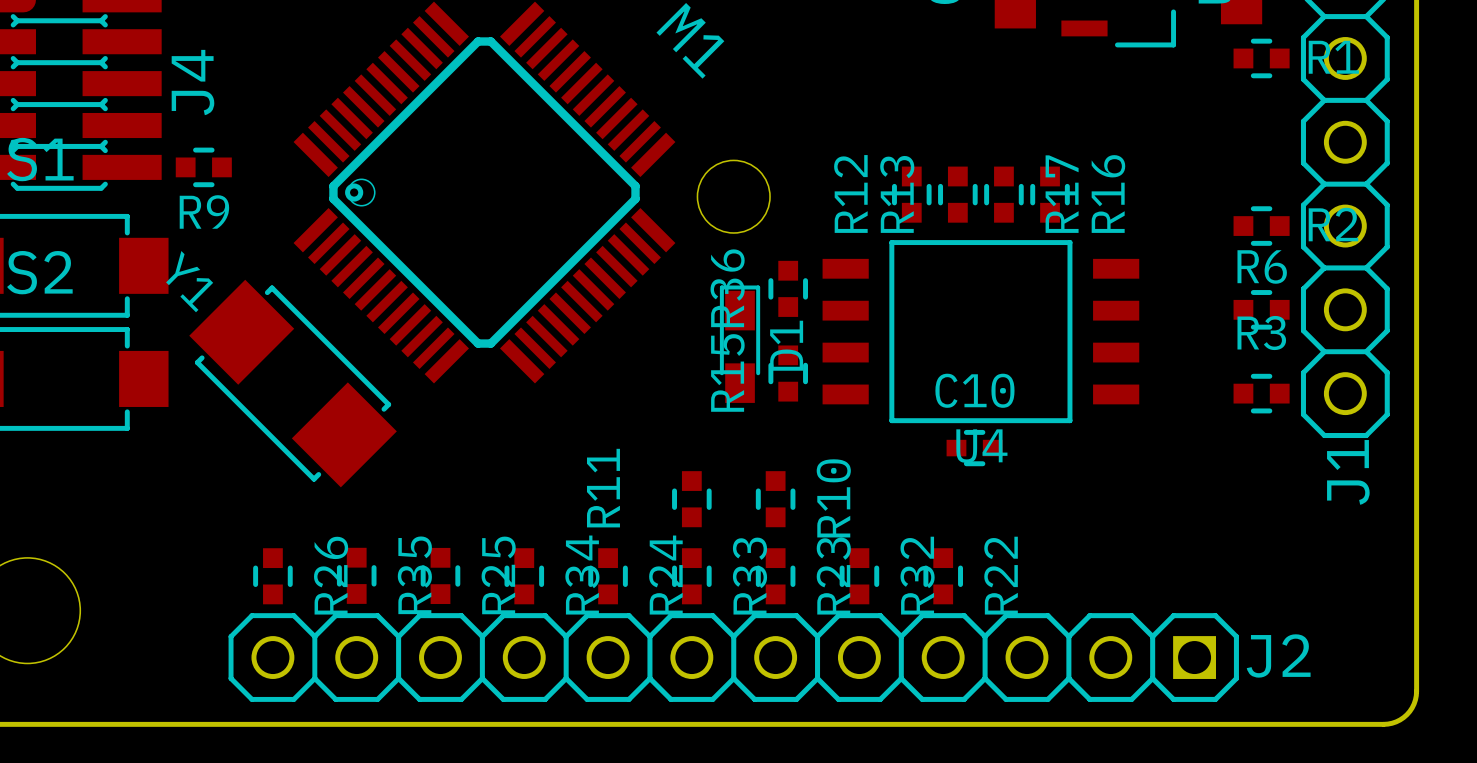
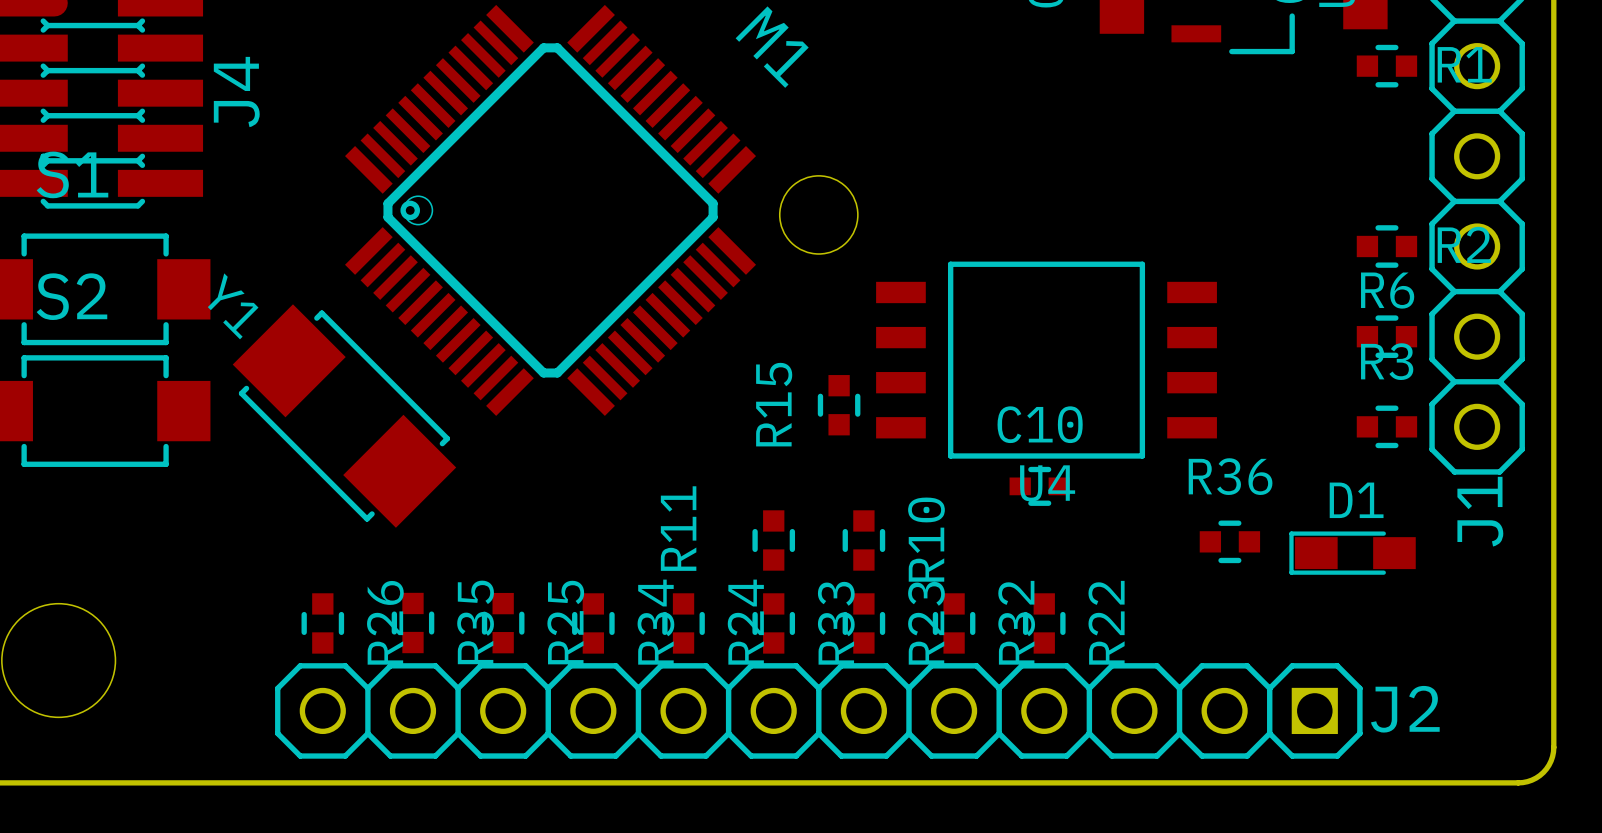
R9: (203, 167) -> none
R12: (911, 194) -> none
R13: (957, 194) -> none
R17: (1003, 194) -> none
R16: (1050, 194) -> none
R36 rotation: 0° (788, 288) -> 90° clockwise (1229, 541)
R36 position: (788, 288) -> (1229, 541)
U4 position: (980, 331) -> (1046, 360)
D1 rotation: 0° (740, 344) -> 90° counterclockwise (1352, 553)
D1 position: (740, 344) -> (1352, 553)
R15 position: (788, 373) -> (839, 405)
C10 position: (974, 448) -> (1039, 486)

